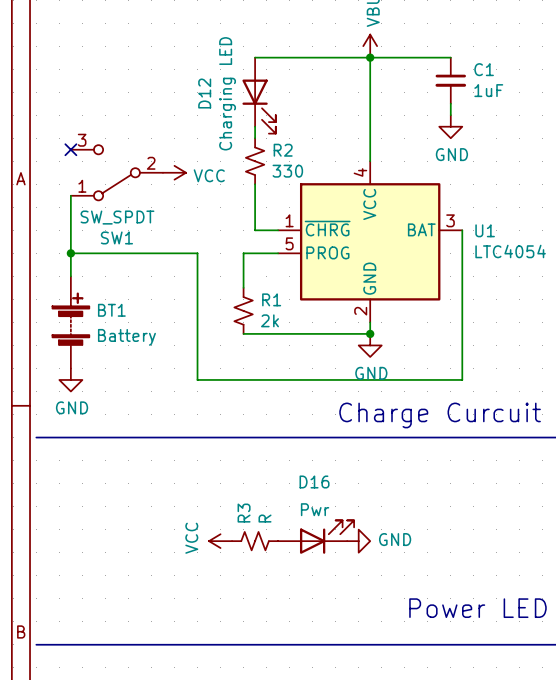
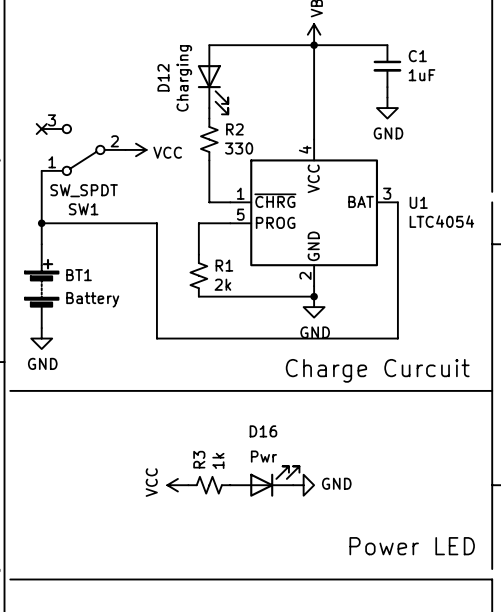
D12 value: Charging LED (227, 93) -> Charging (184, 78)
R3 value: R (265, 518) -> 1k (218, 460)

